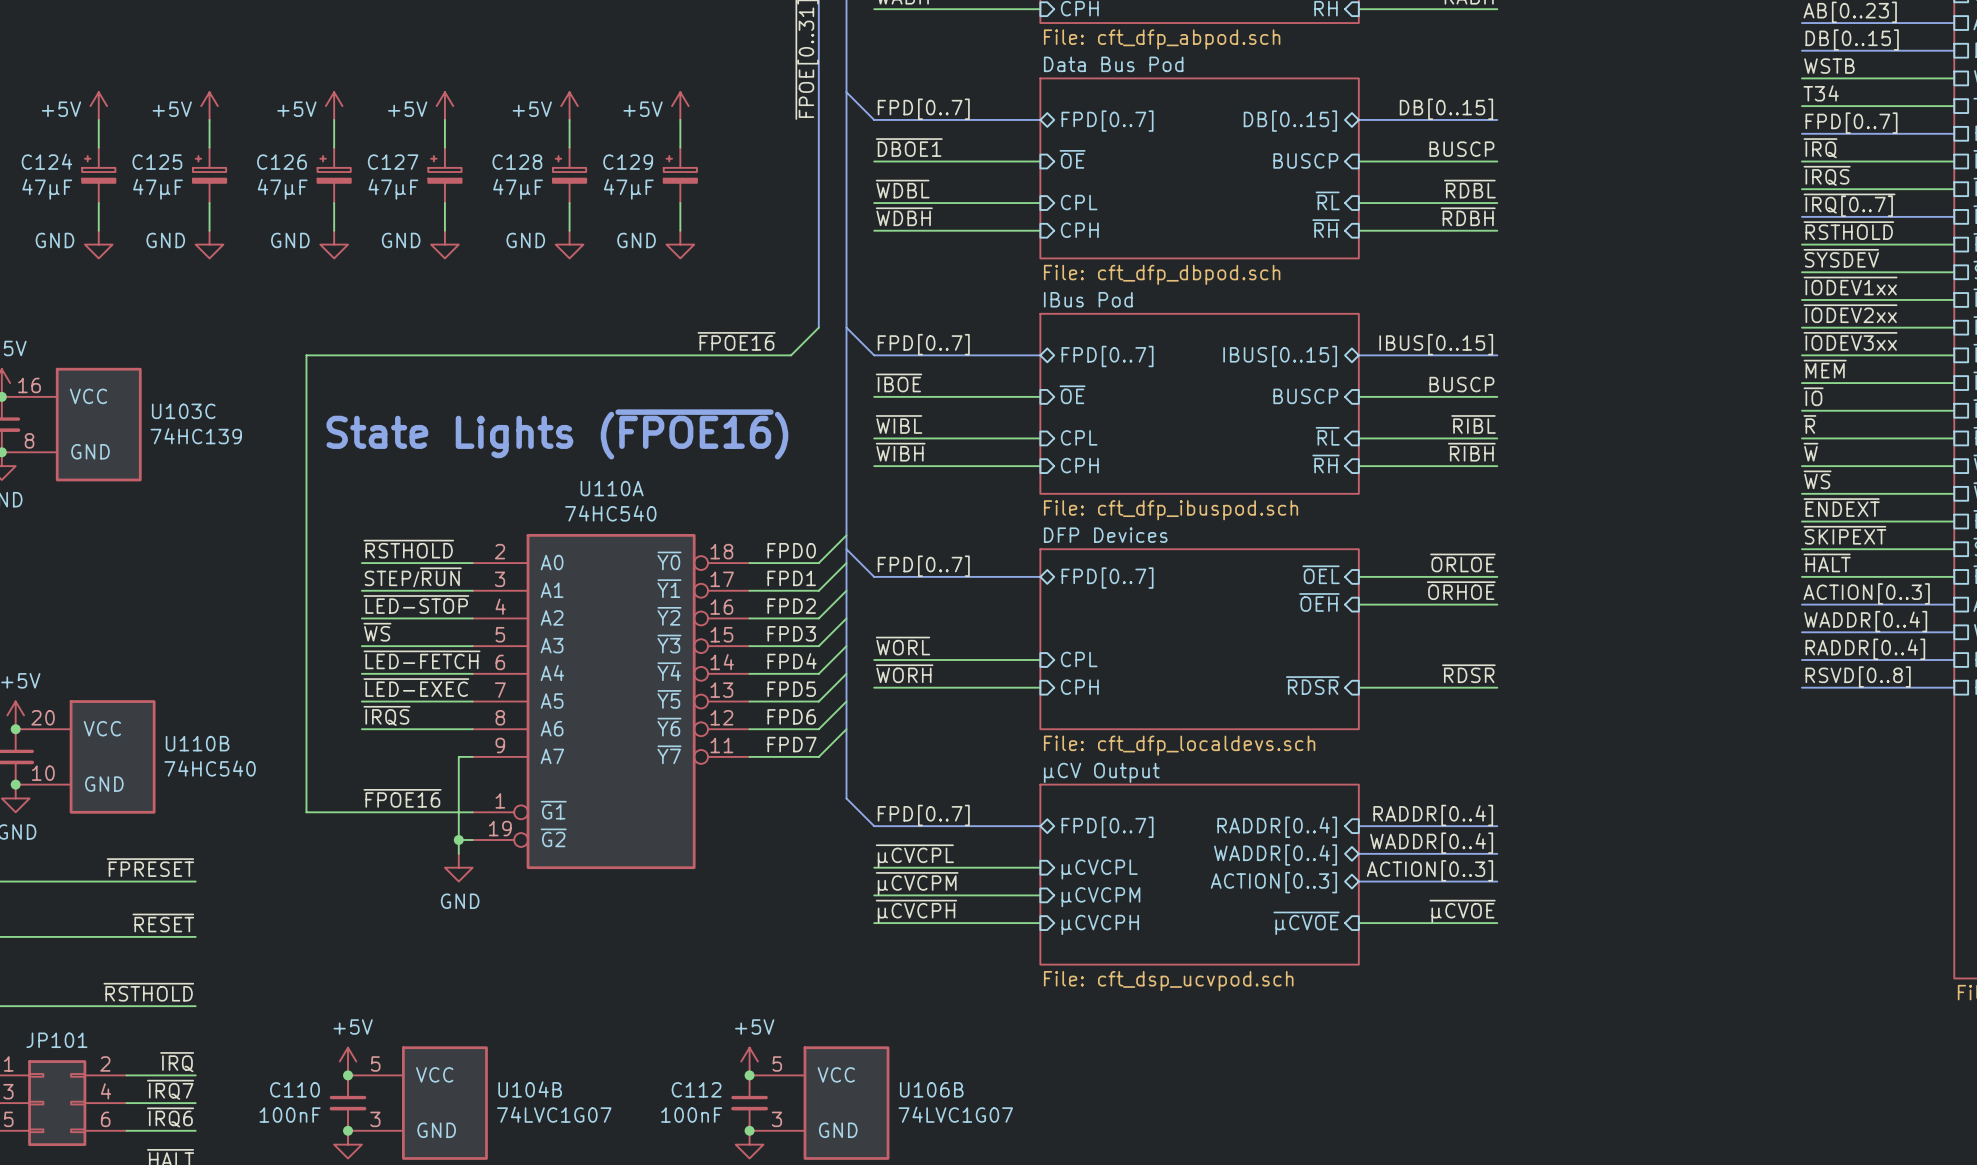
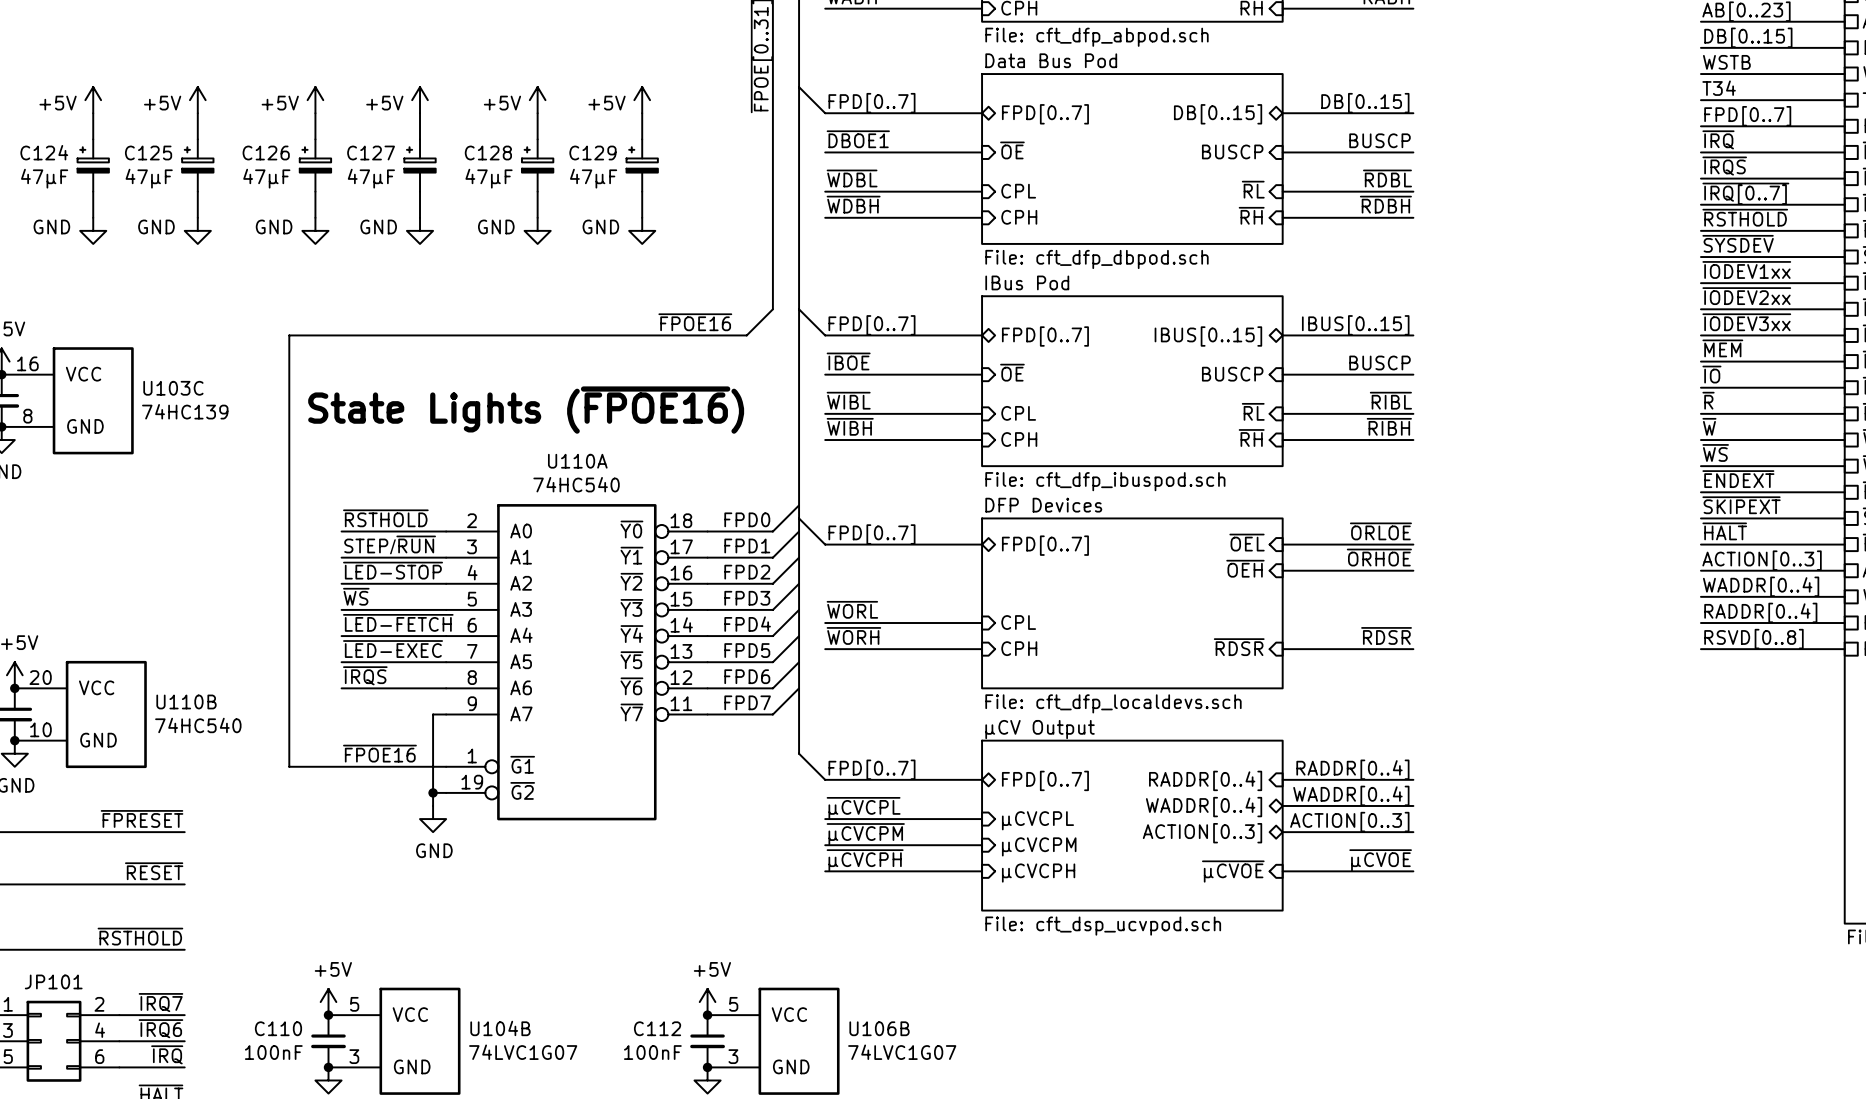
label: ~{IRQ} (177, 1062) -> ~{IRQ7} (160, 1002)
label: ~{IRQ7} (170, 1089) -> ~{IRQ6} (160, 1028)
label: ~{IRQ6} (170, 1117) -> ~{IRQ} (167, 1054)

